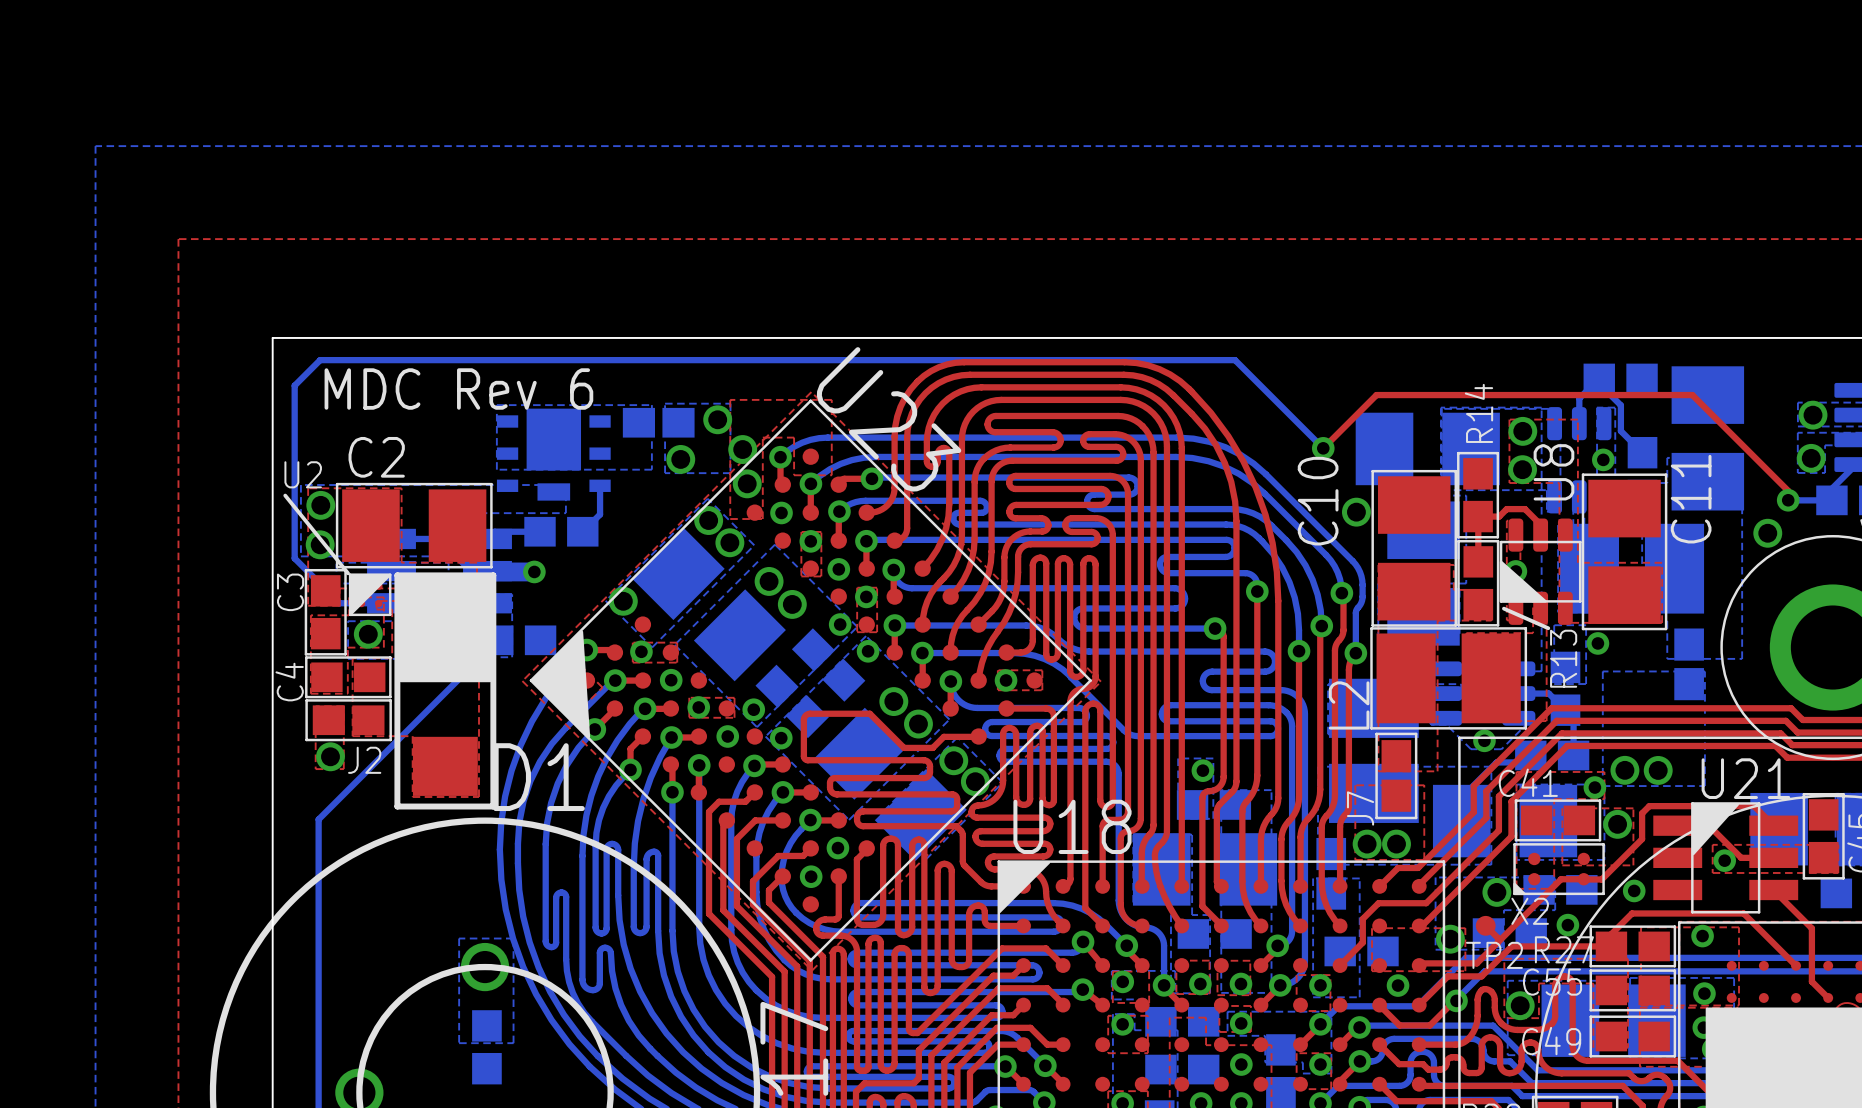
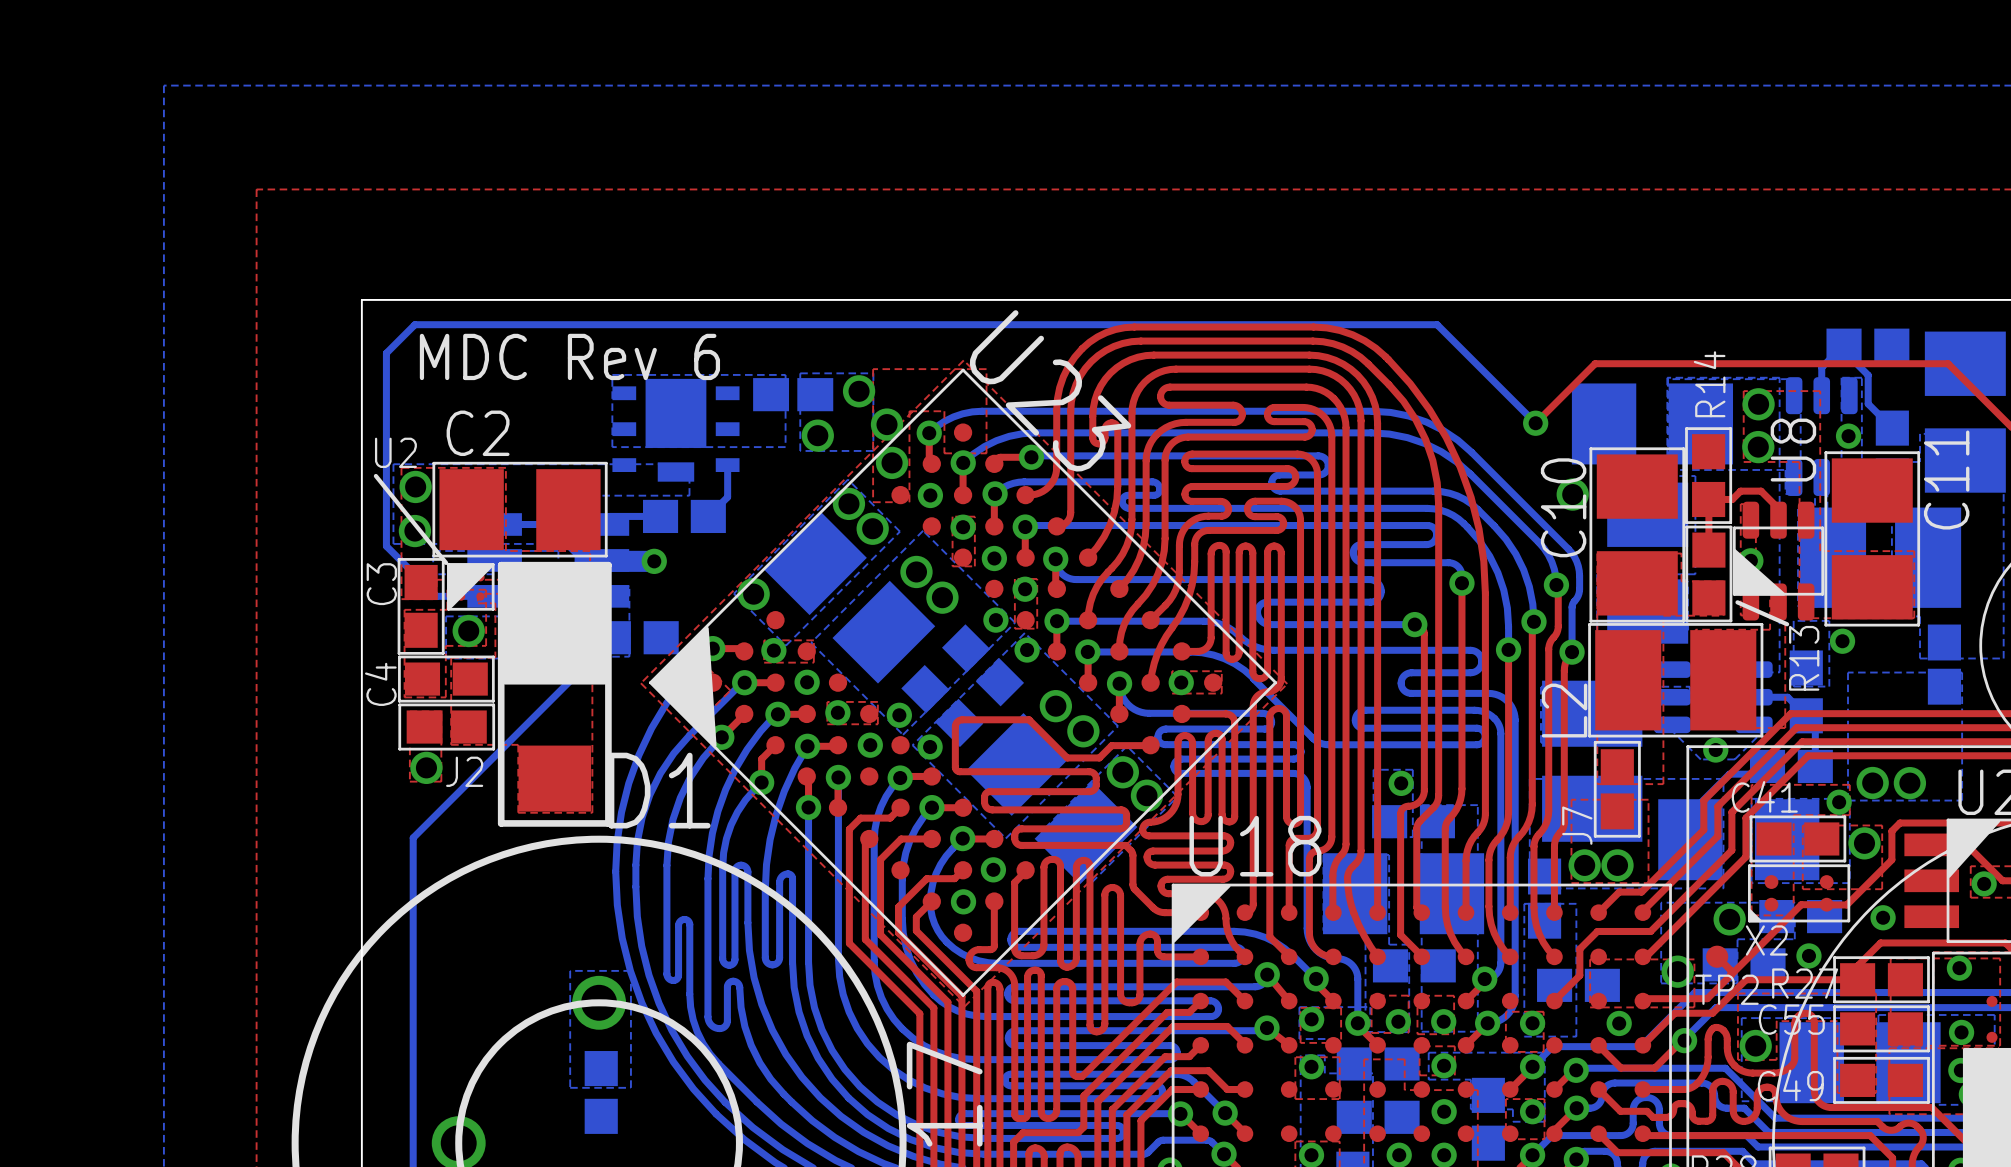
C10 name position: C10 (1318, 501) -> C10 (1563, 507)

